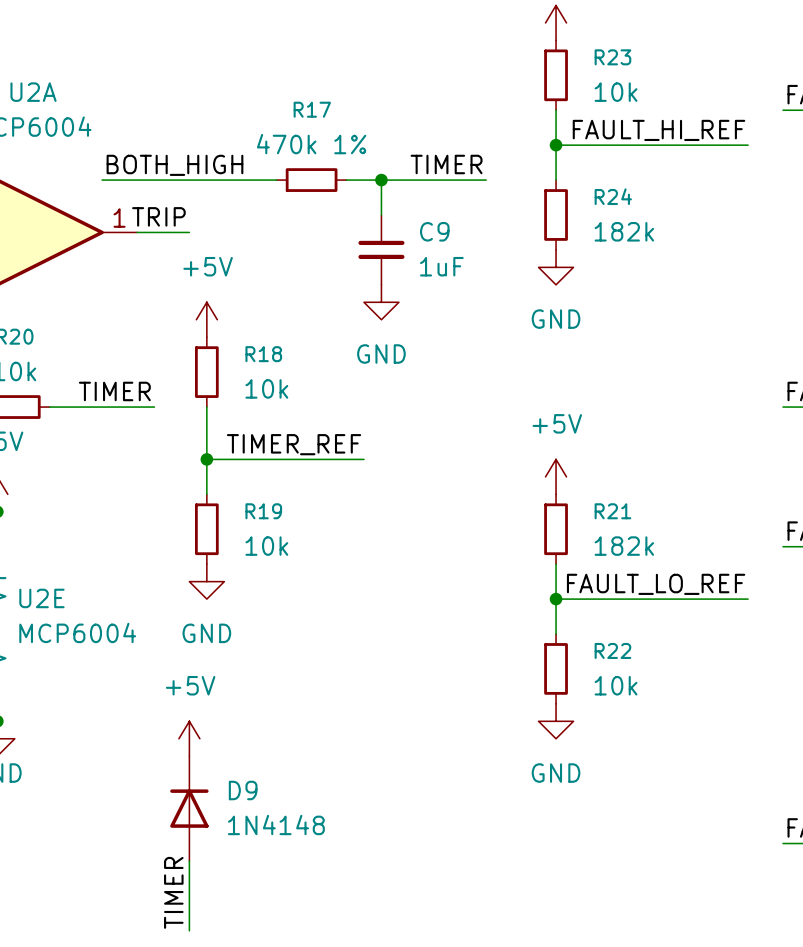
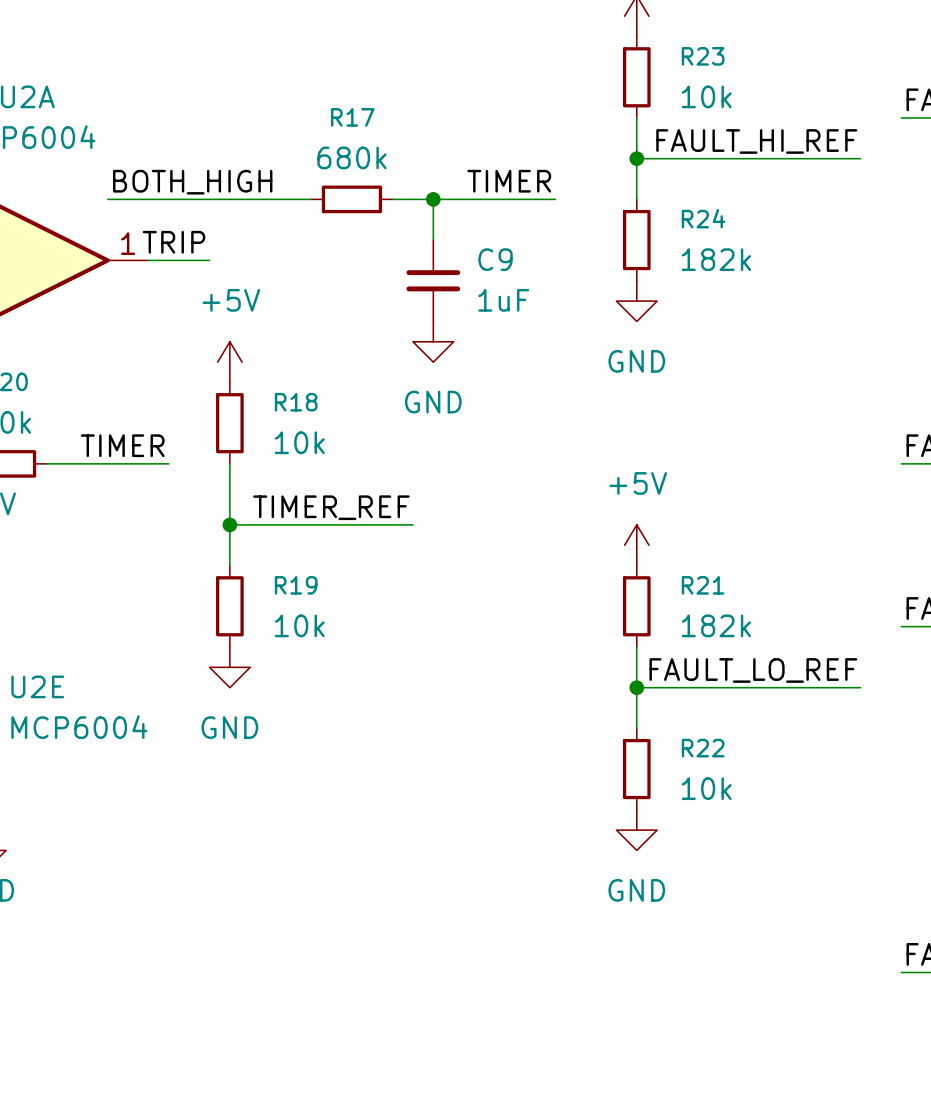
R17 value: 470k 1% (311, 144) -> 680k (351, 157)
power symbol: +5V (189, 738) -> none
D9: 1N4148 (189, 808) -> none
wire: (189, 860) (189, 930) -> none
label: TIMER (173, 892) -> none

